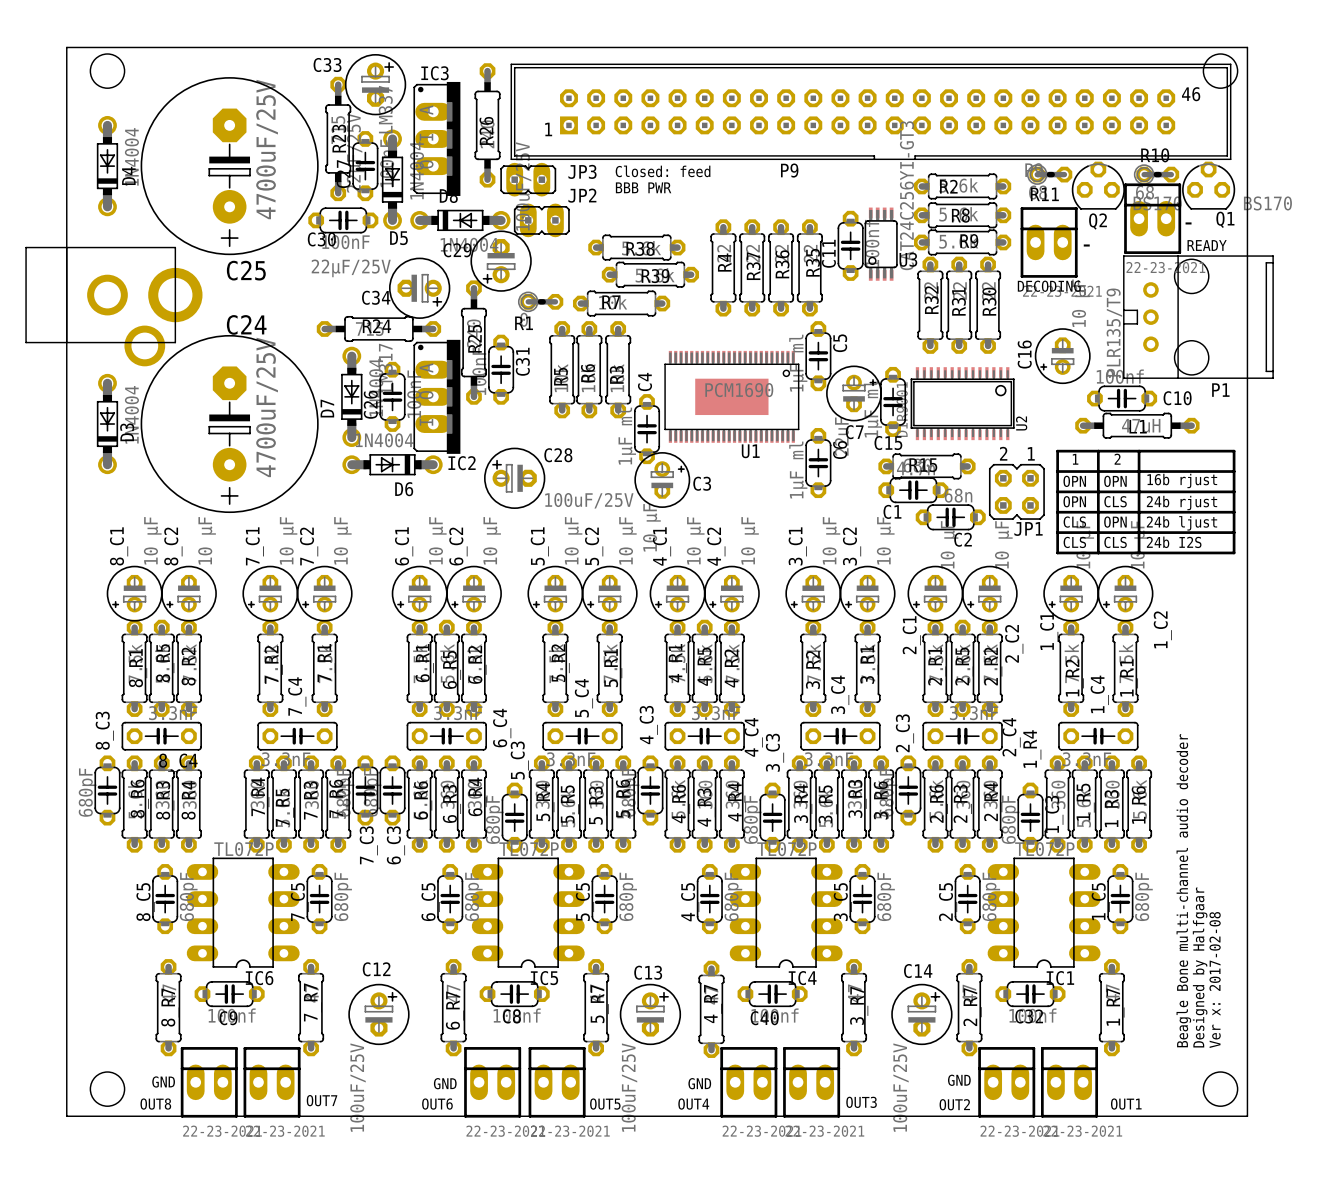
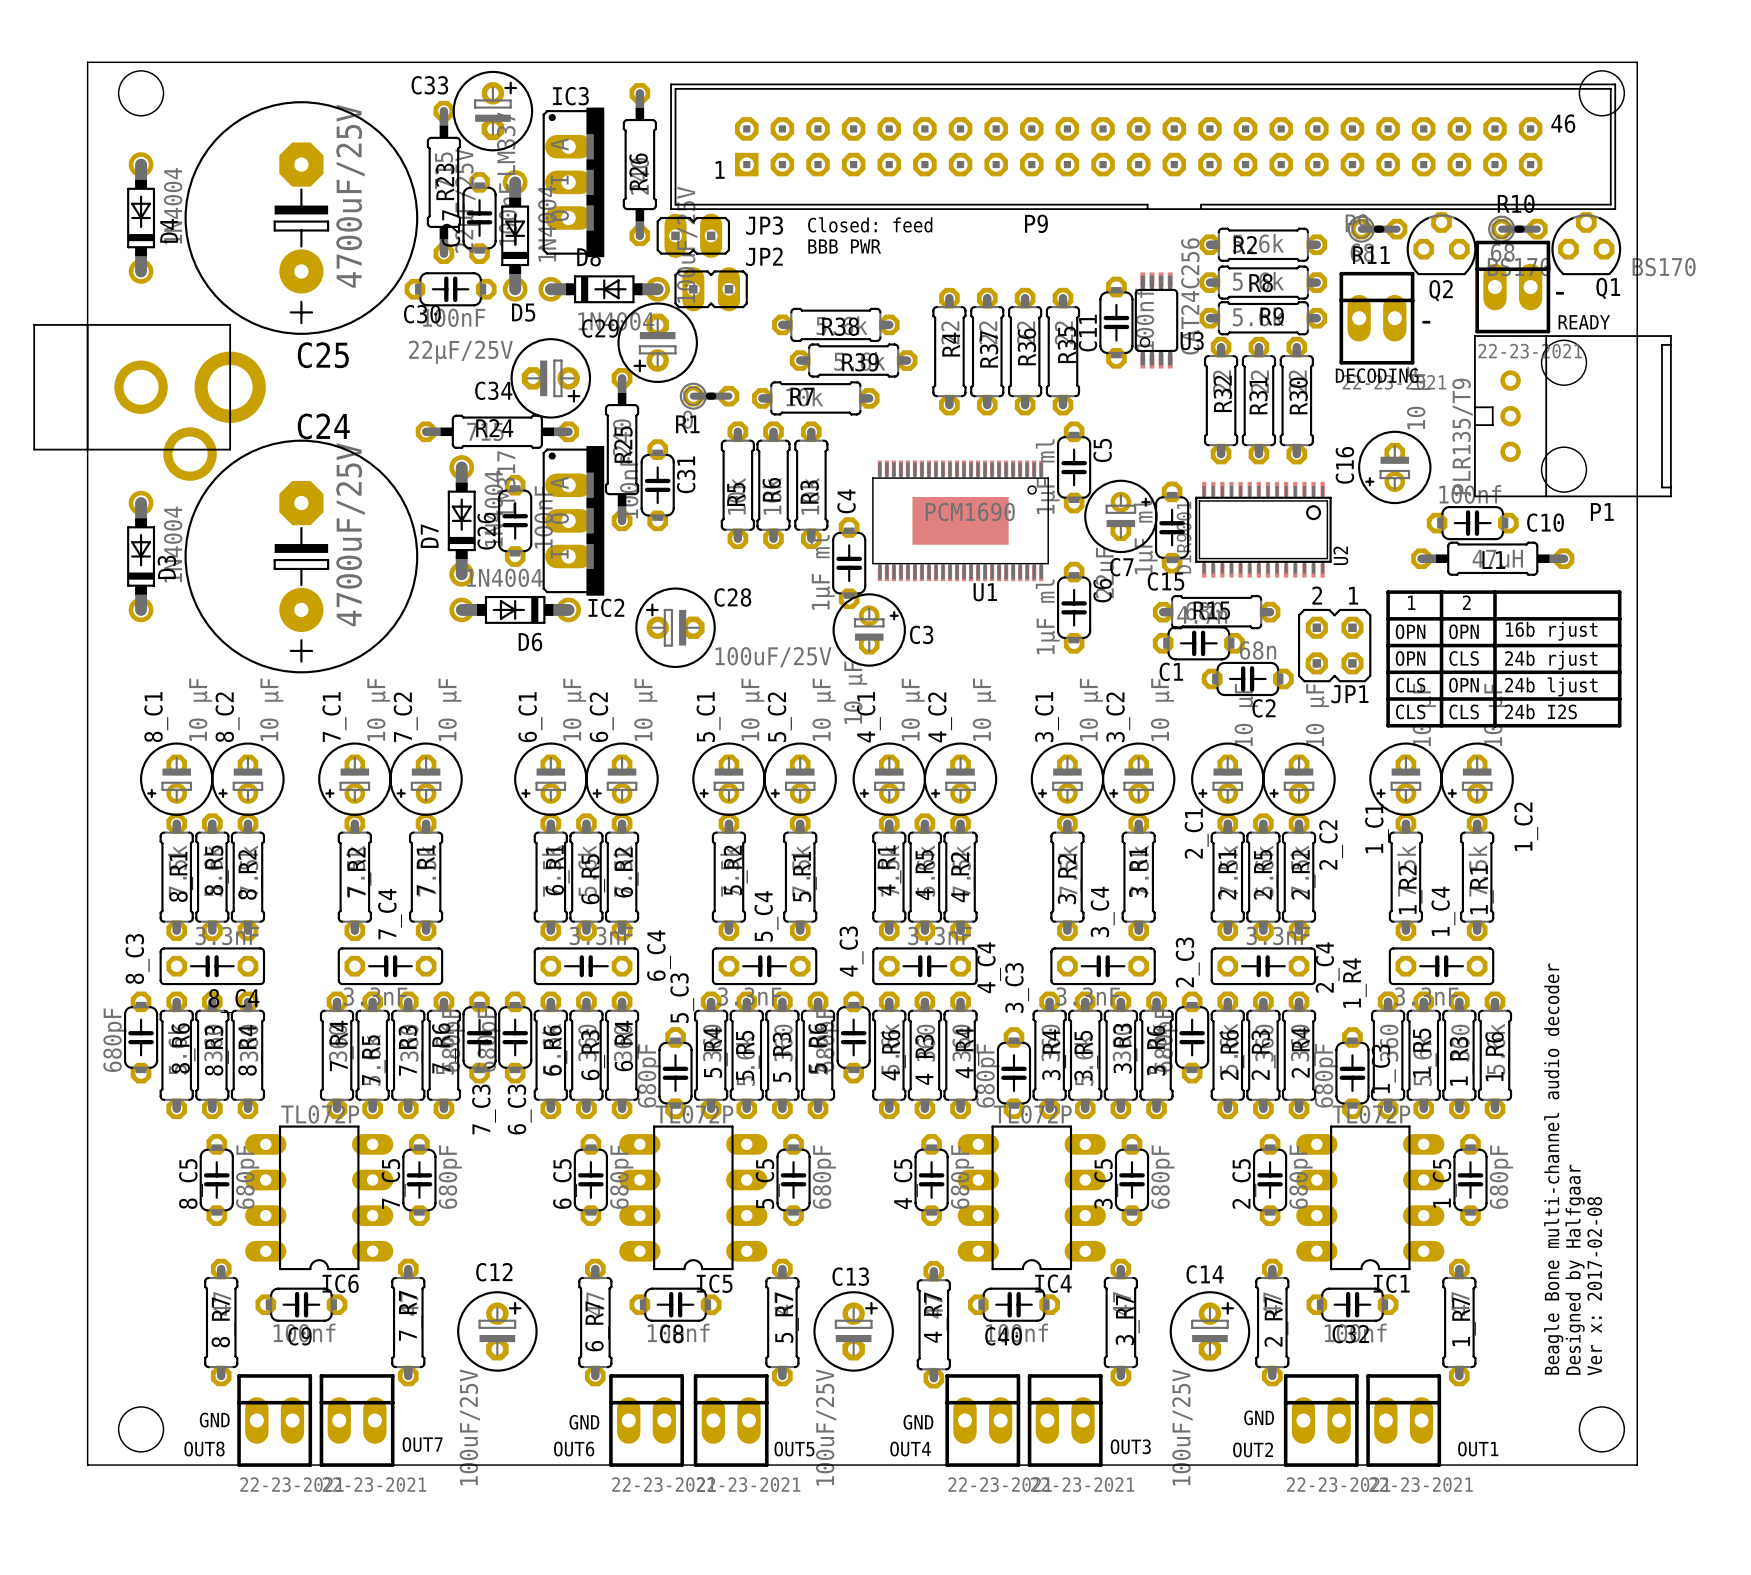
U3 value: CAT24C256YI-GT3 (906, 195) -> CAT24C256 (1190, 296)

